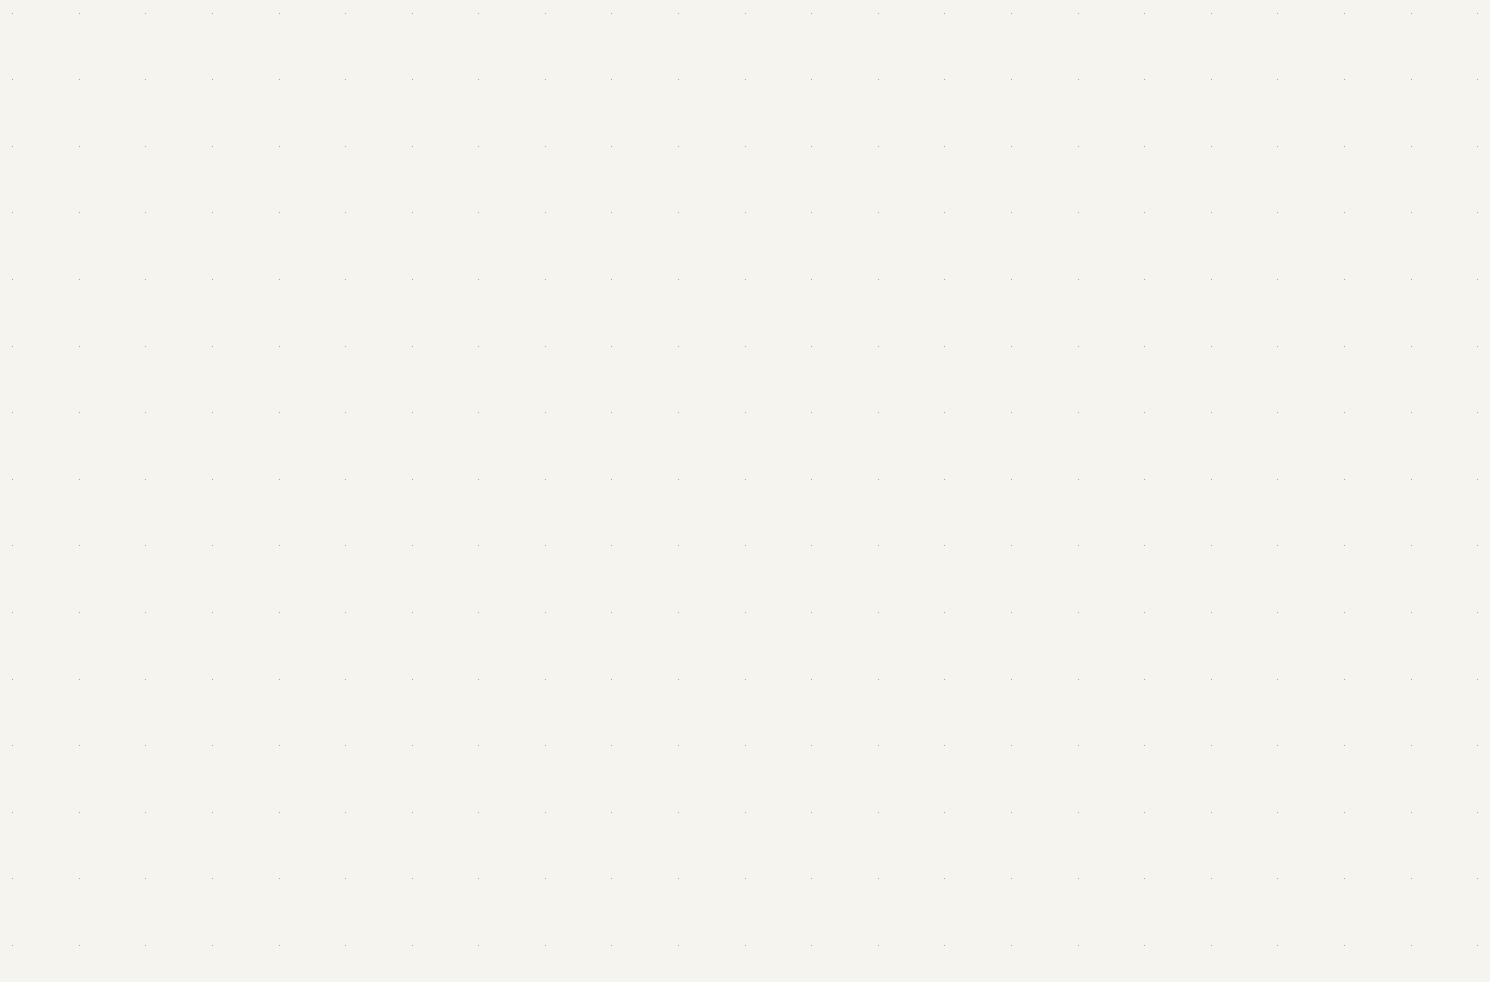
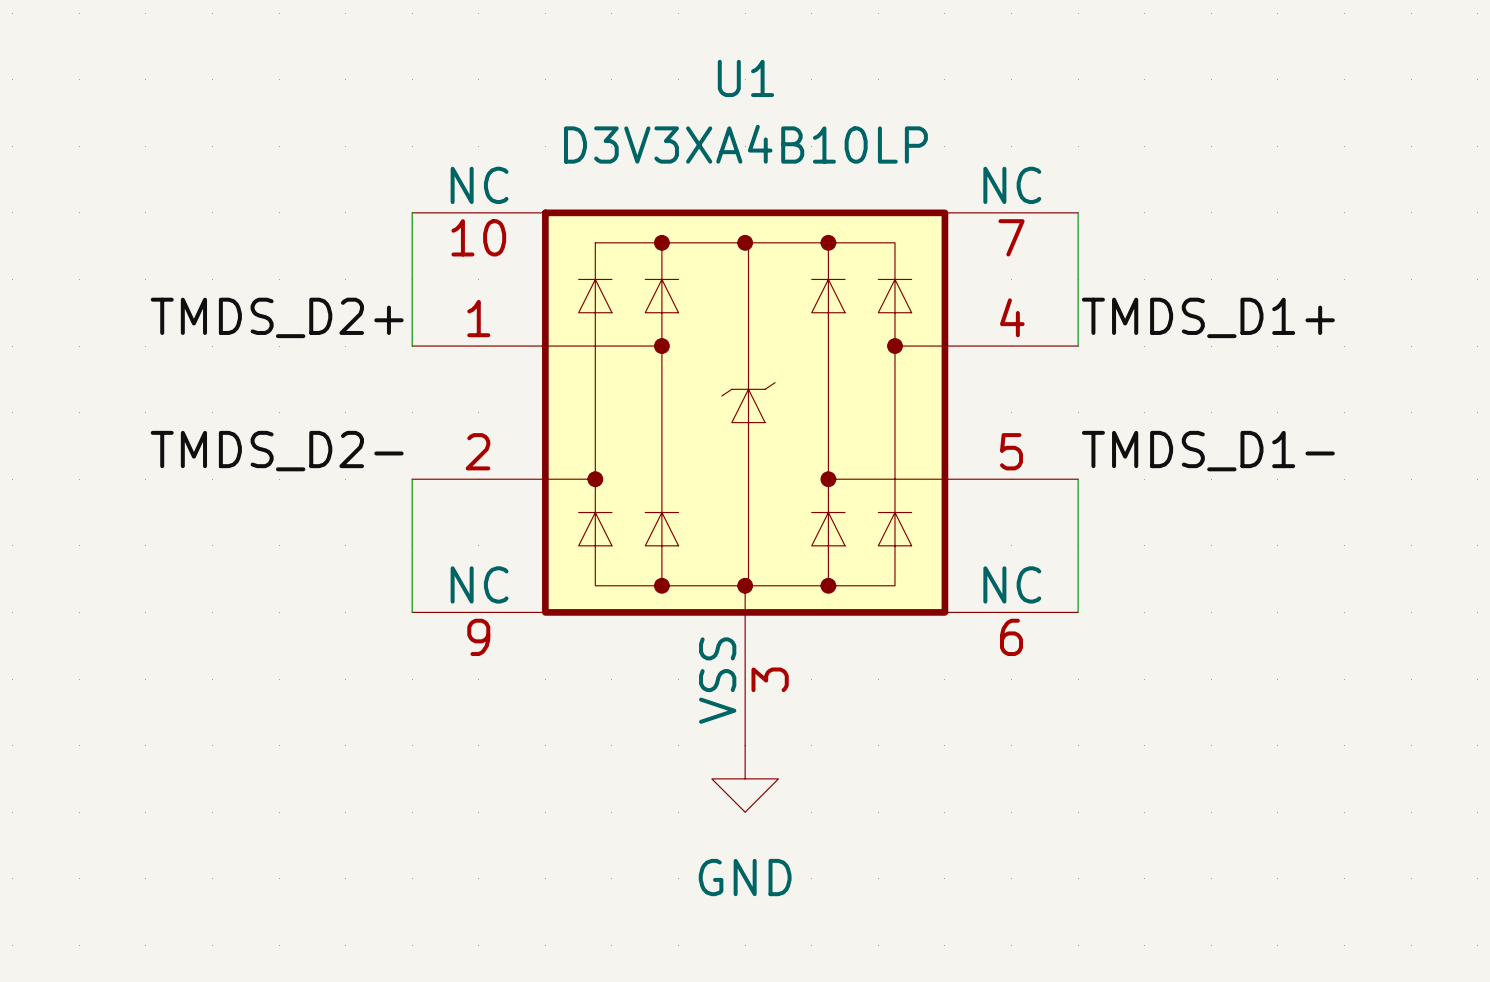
wire: none -> (412, 212) (412, 346)
wire: none -> (1078, 212) (1078, 346)
label: none -> TMDS_D2+ (277, 317)
label: none -> TMDS_D1+ (1208, 317)
label: none -> TMDS_D2- (277, 451)
label: none -> TMDS_D1- (1208, 451)
U1: none -> D3V3XA4B10LP (745, 477)
wire: none -> (412, 479) (412, 612)
wire: none -> (1078, 479) (1078, 612)
power symbol: none -> GND (745, 778)

